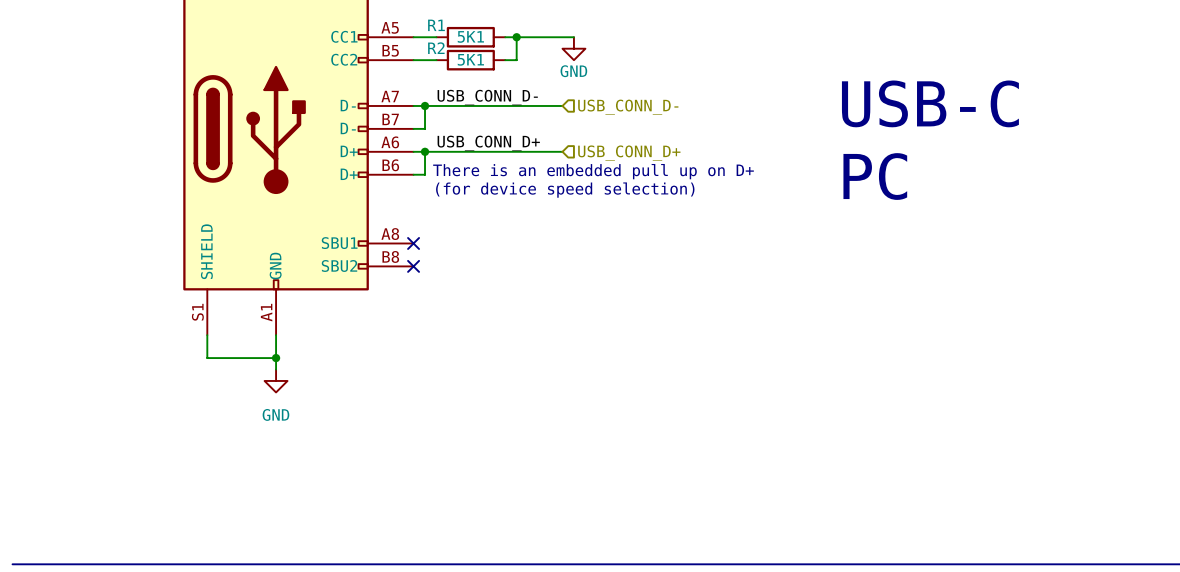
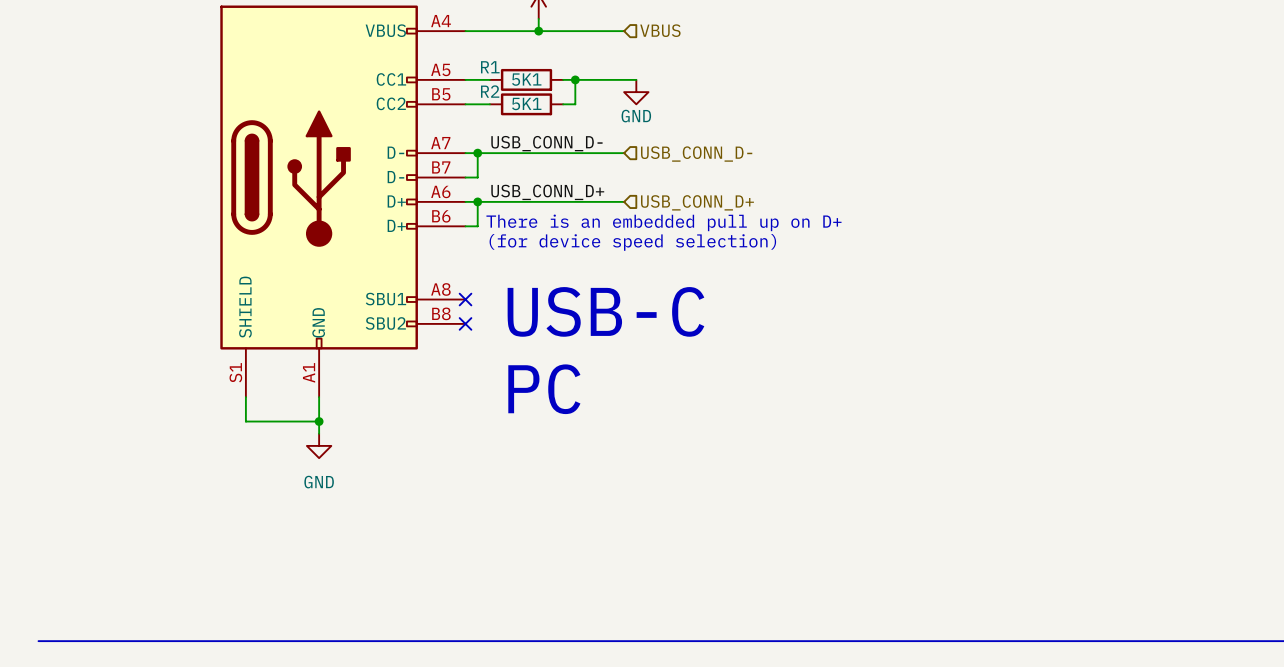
text: USB-C (930, 103) -> none
text: PC (875, 176) -> none
text: none -> USB-C (605, 311)
text: none -> PC (544, 389)

